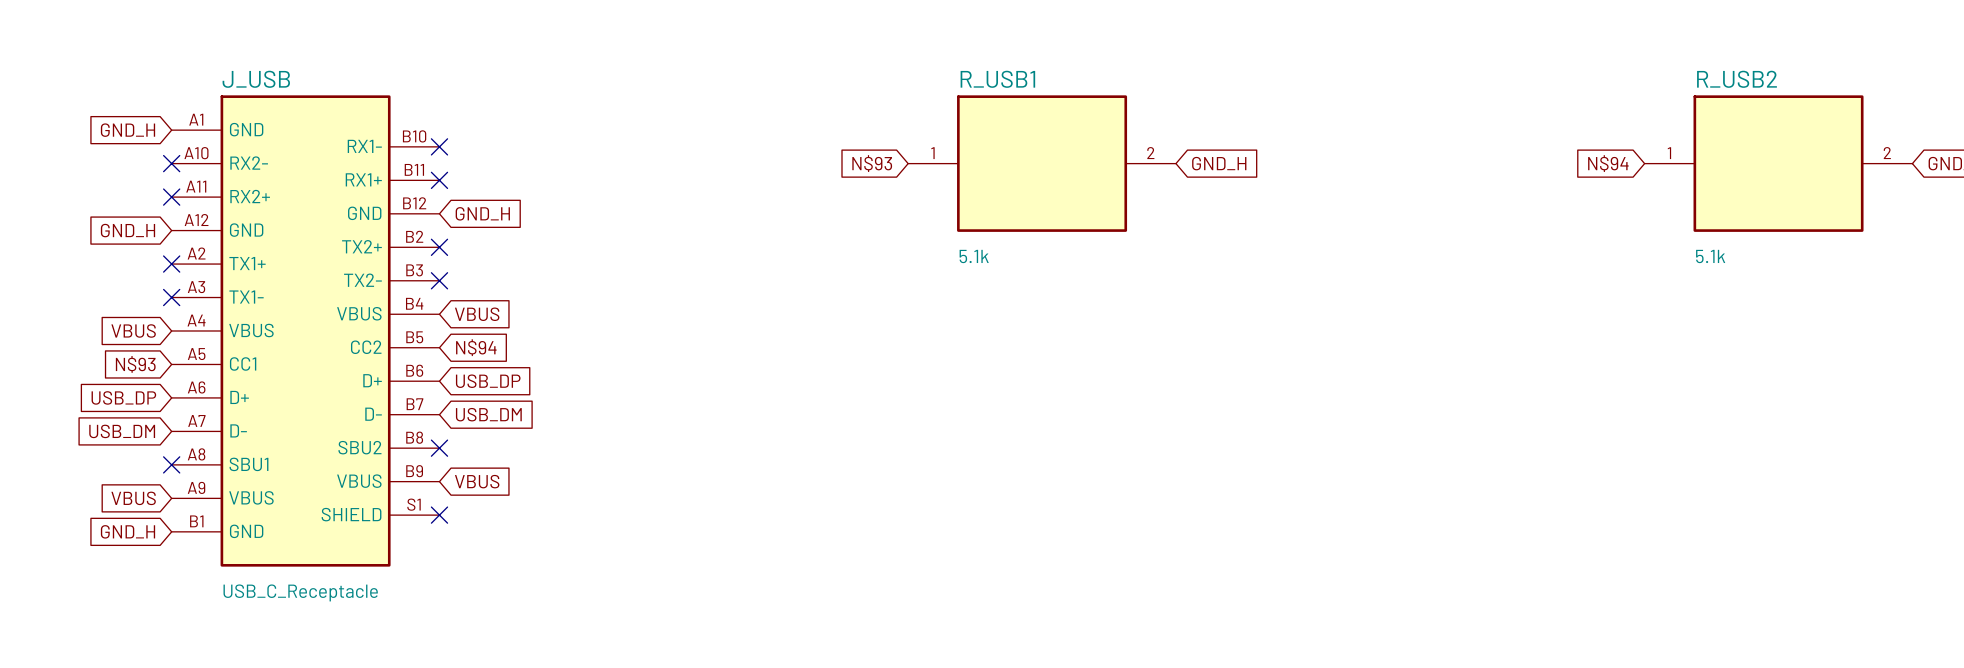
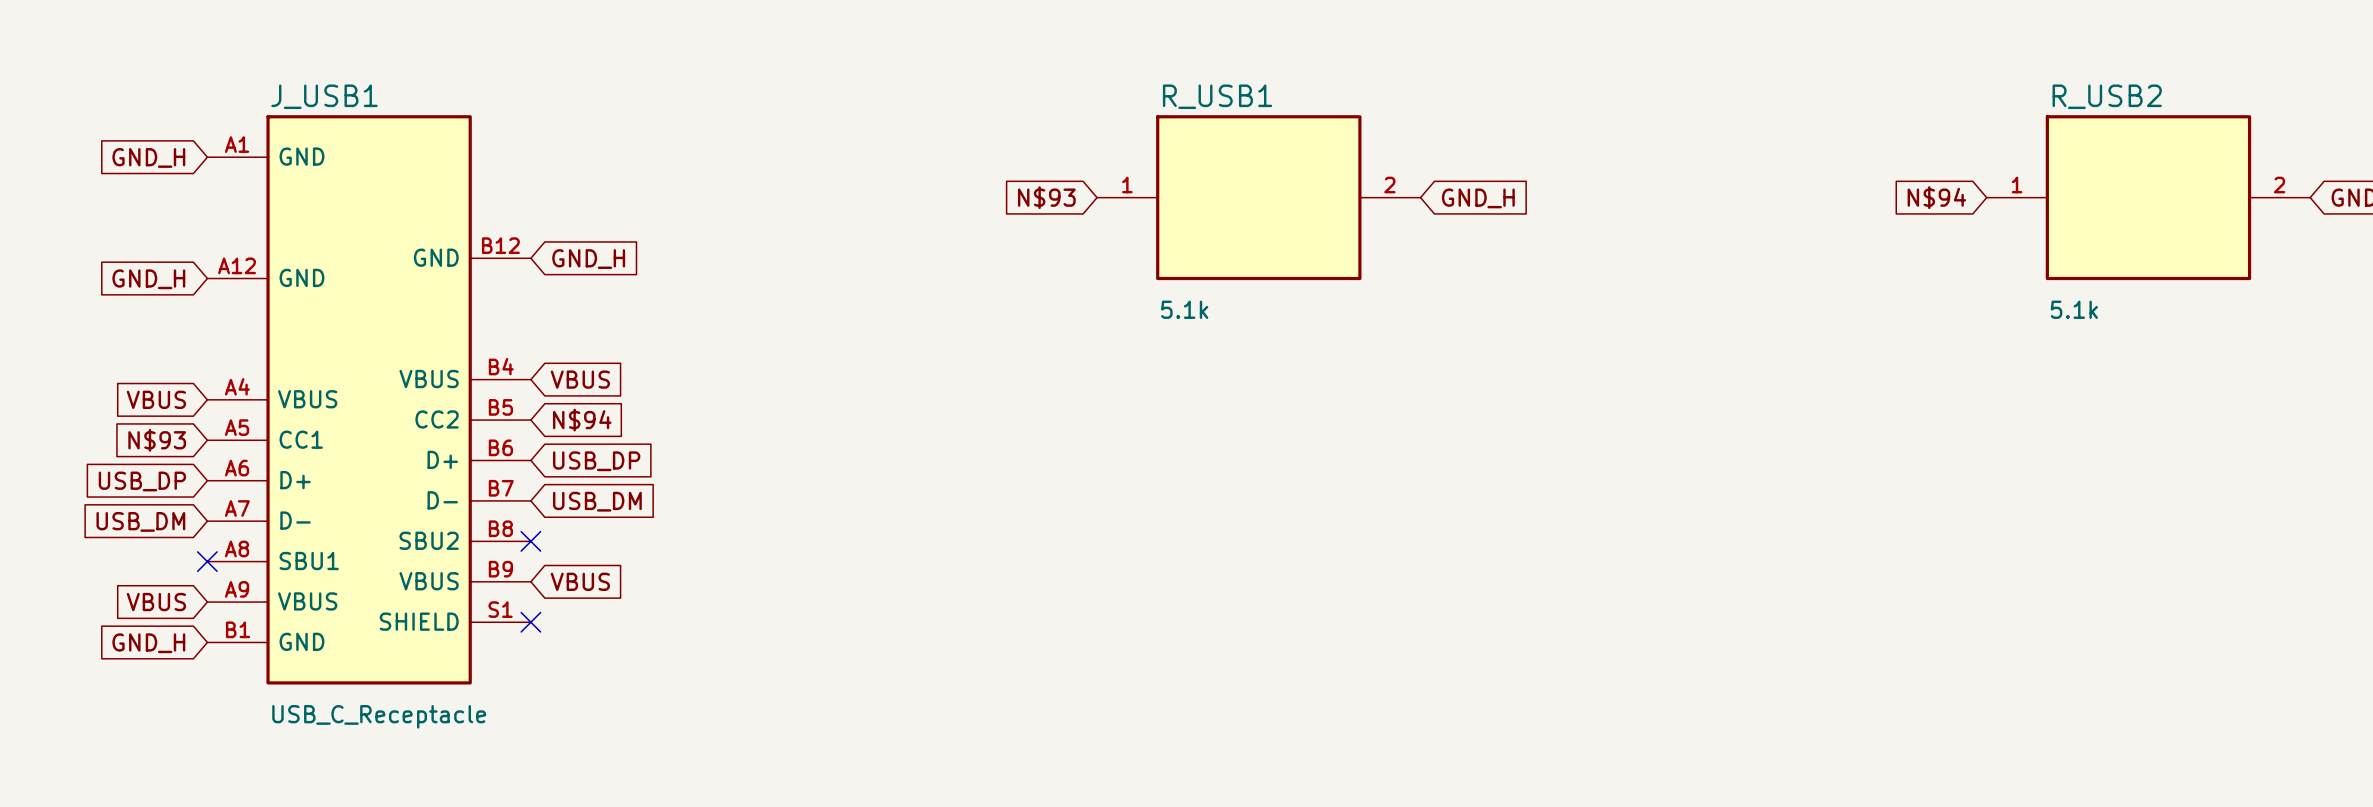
no-connect mark: (439, 146) -> none
no-connect mark: (171, 163) -> none
no-connect mark: (439, 180) -> none
no-connect mark: (171, 197) -> none
no-connect mark: (439, 247) -> none
no-connect mark: (171, 264) -> none
no-connect mark: (439, 280) -> none
no-connect mark: (171, 297) -> none
J_USB: USB_C_Receptacle (305, 330) -> none
J_USB1: none -> USB_C_Receptacle (369, 399)

